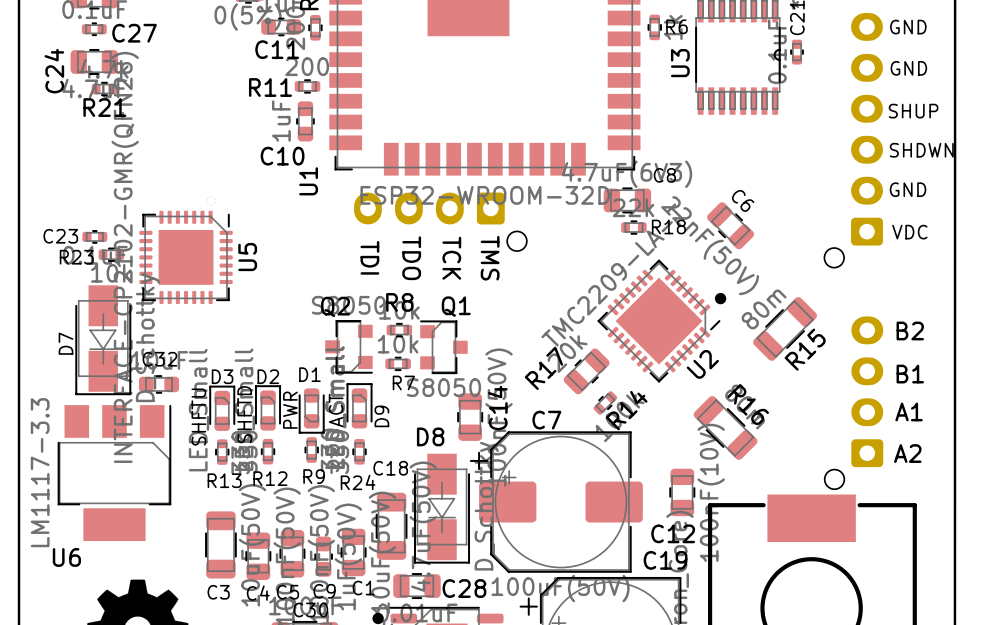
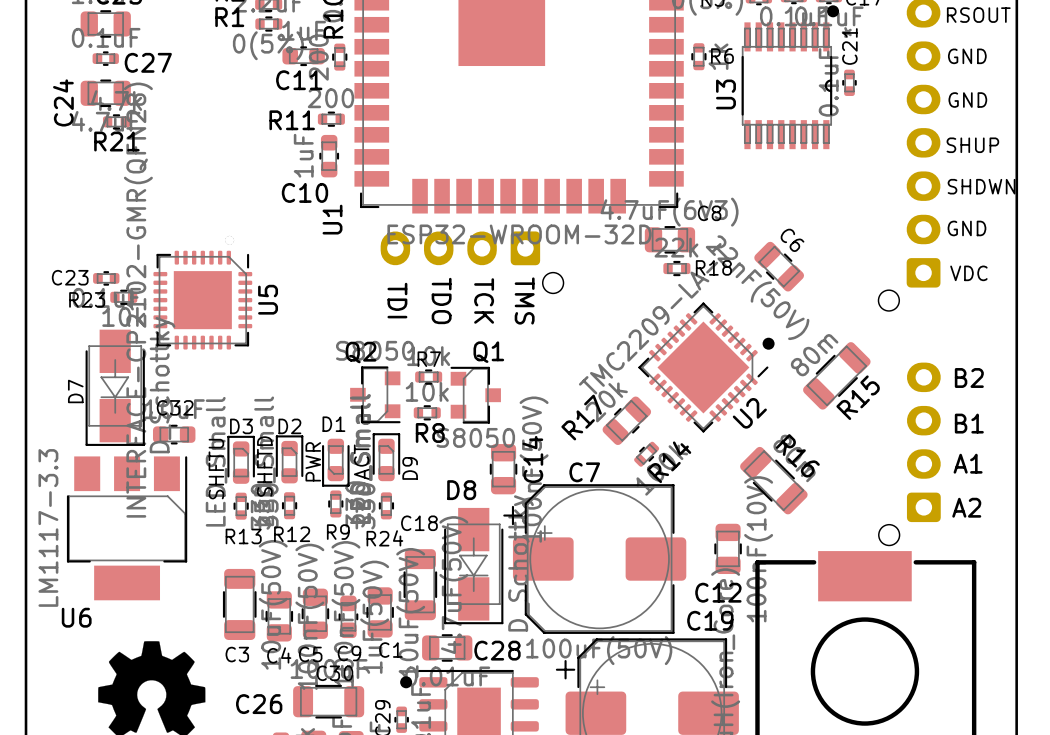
R8 name: R8 (399, 302) -> R7 (429, 359)
R7 name: R7 (403, 382) -> R8 (430, 432)

